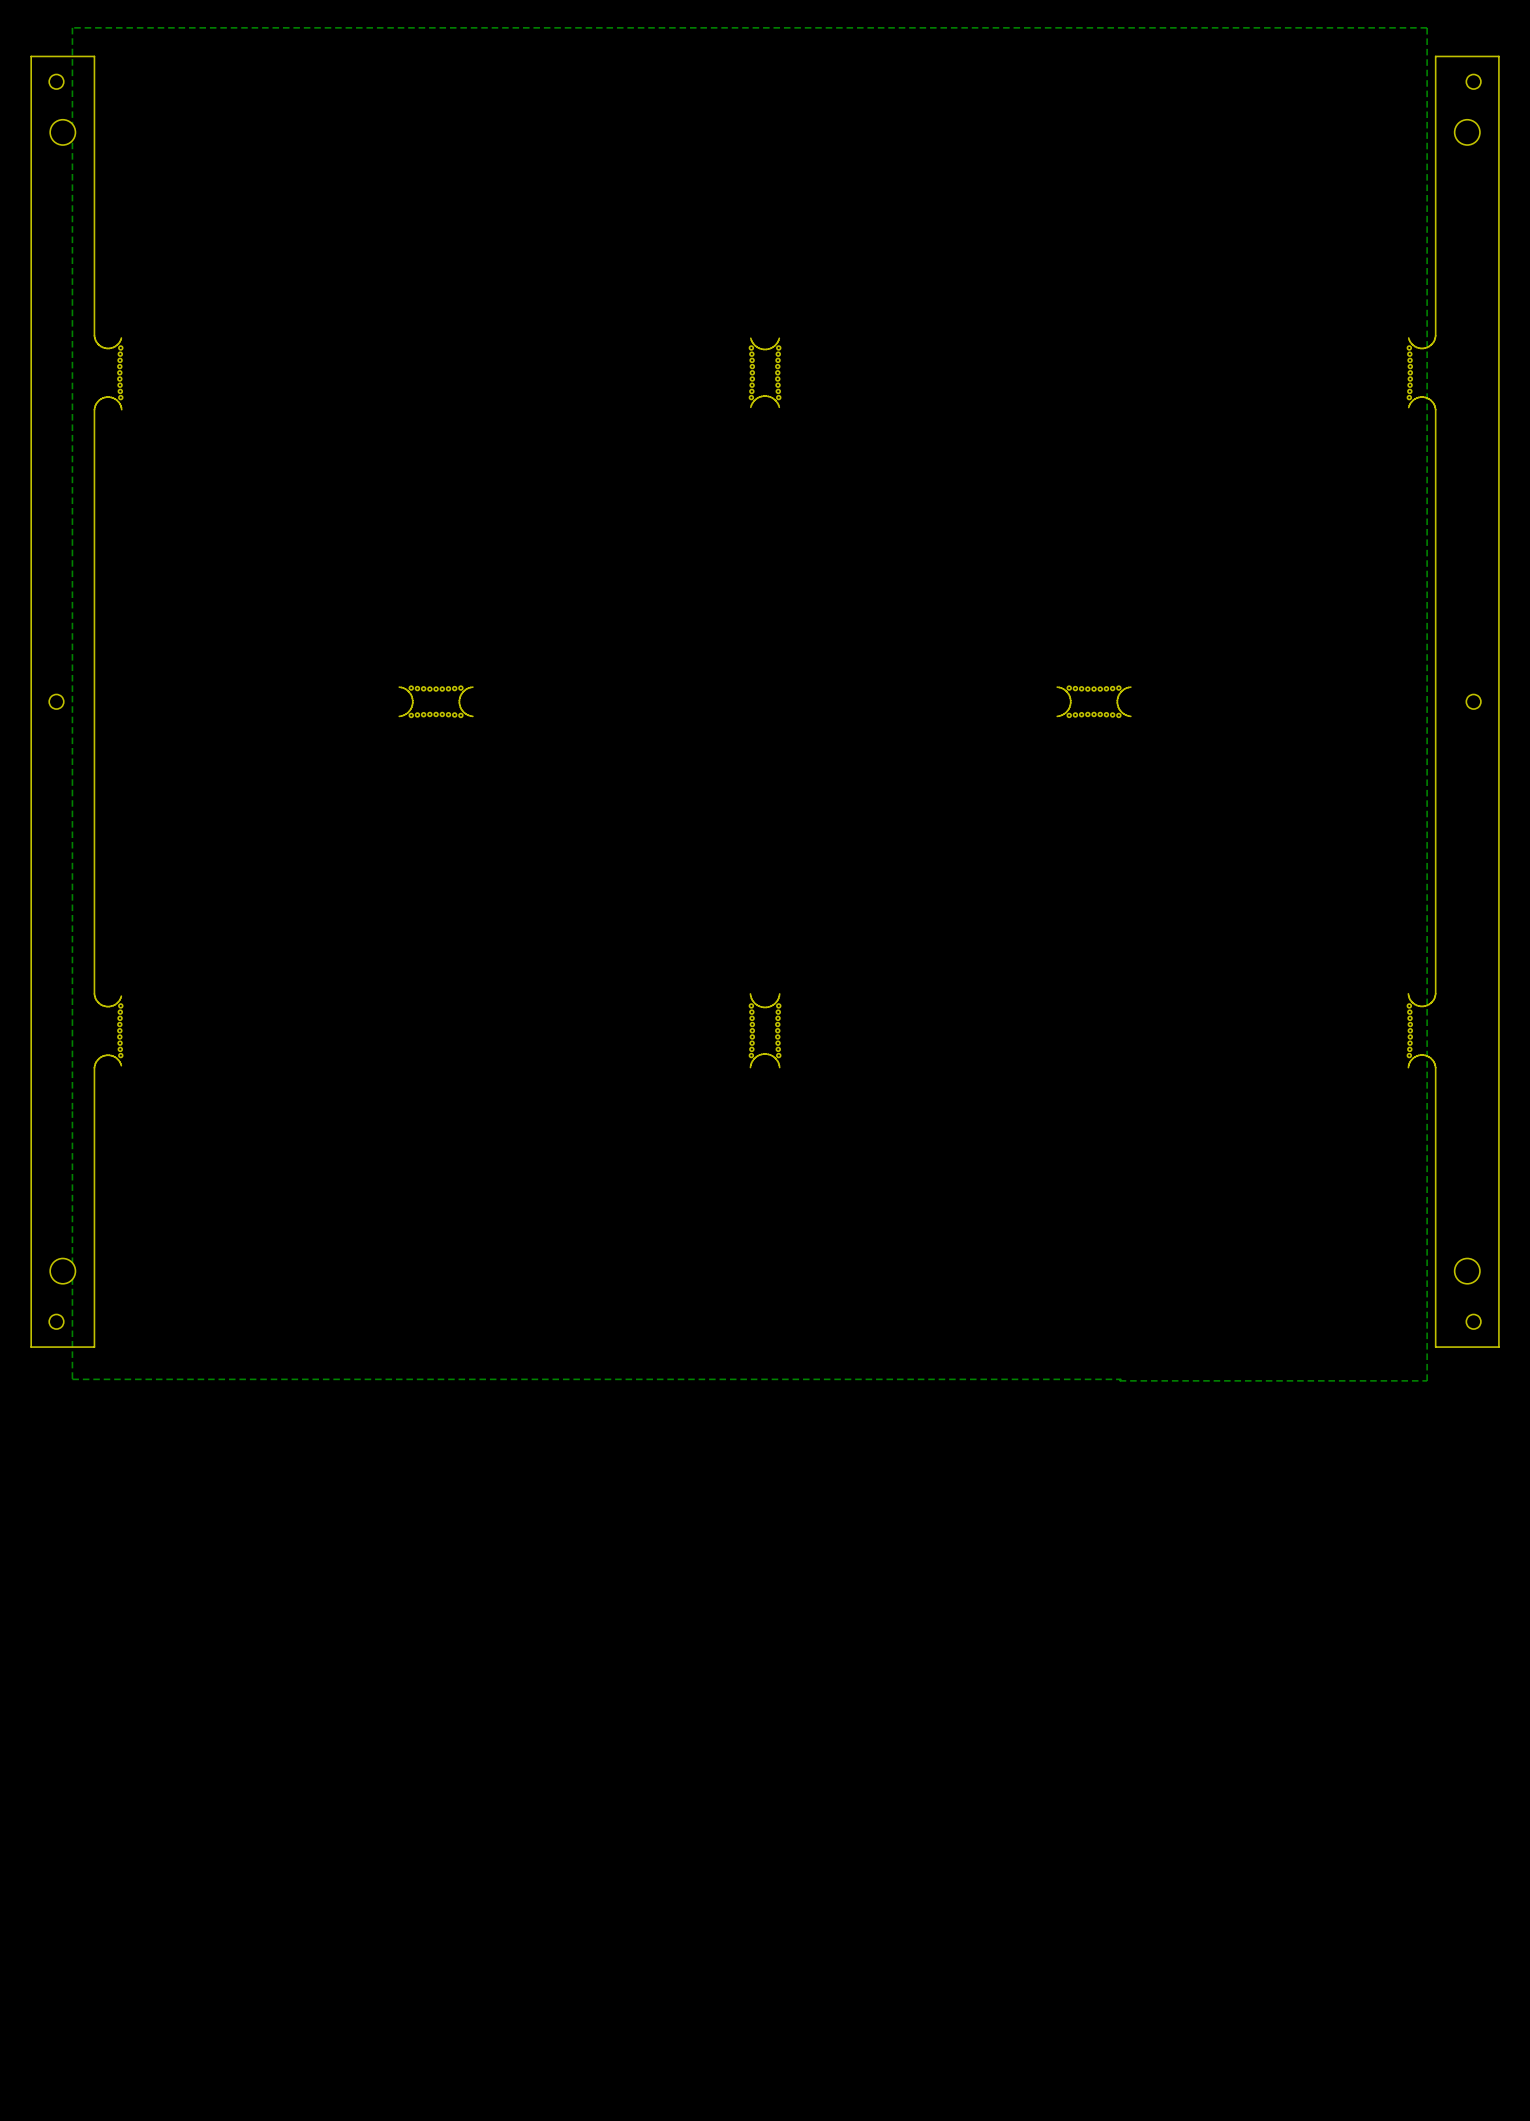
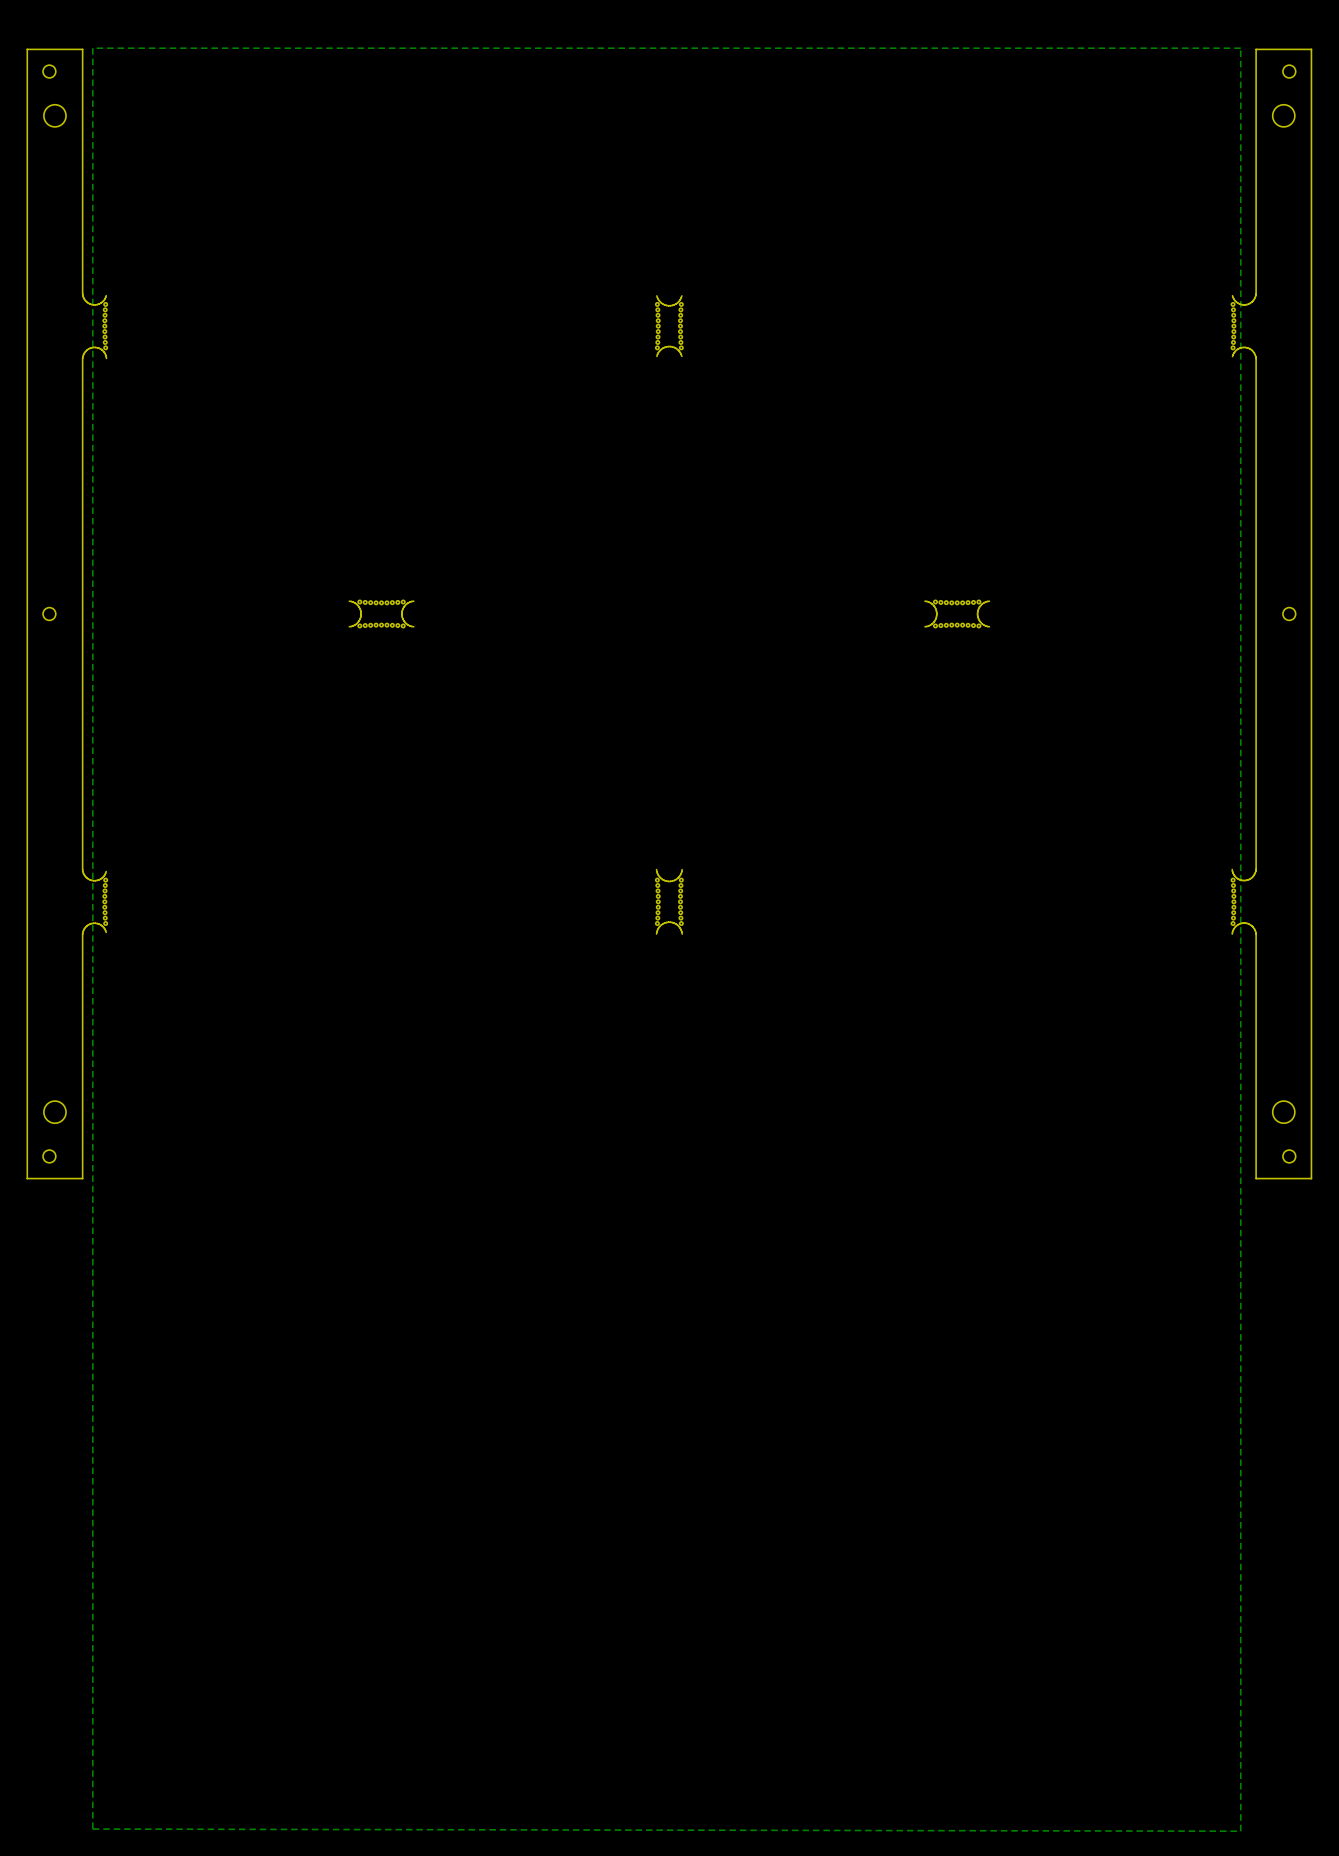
zone outline: (1427, 27) (72, 27) (72, 1379) (1427, 1380) (1427, 27) -> (1240, 48) (1240, 1831) (92, 1829) (92, 48) (1240, 48)

